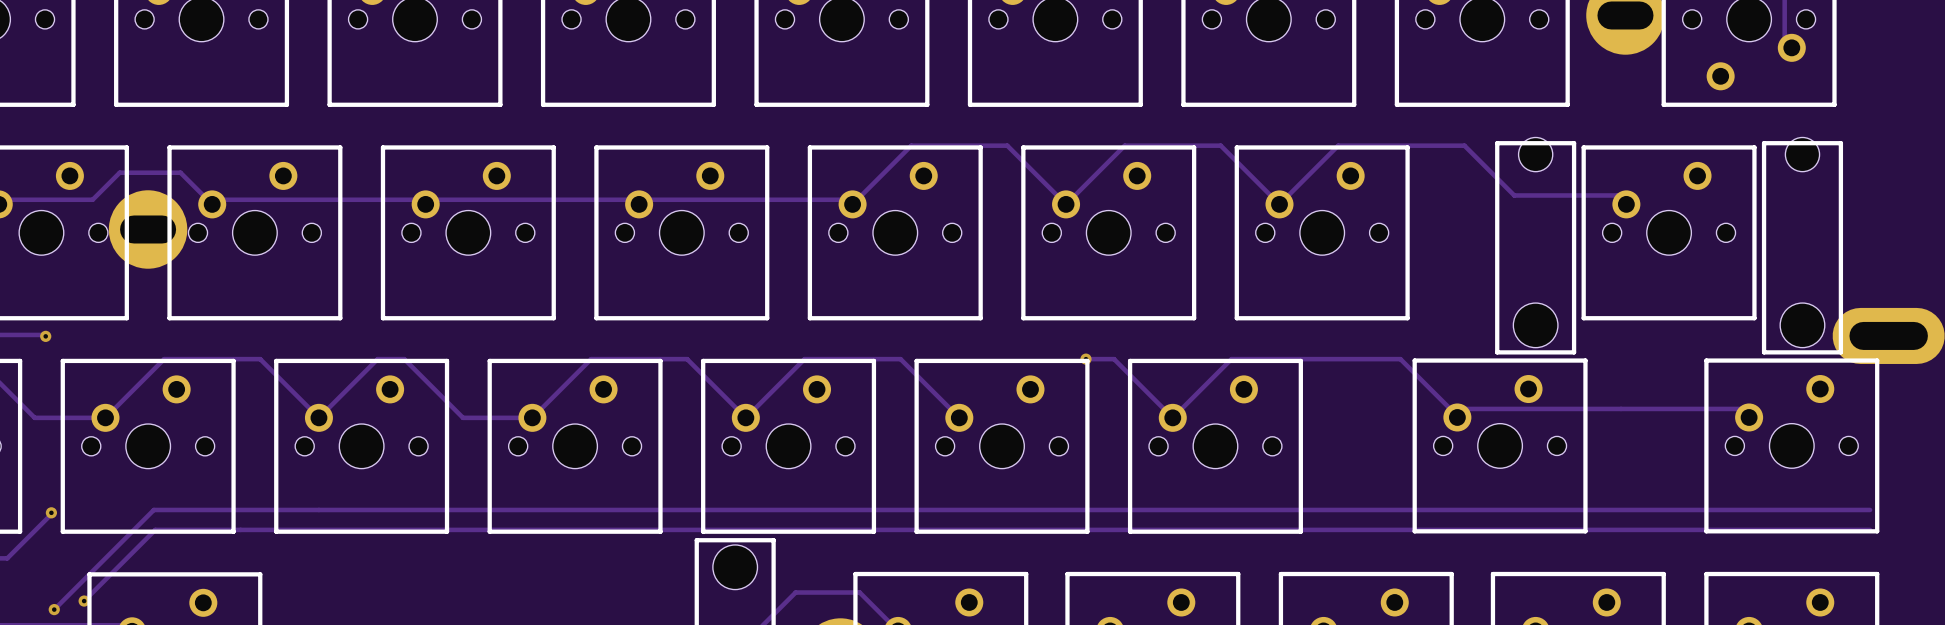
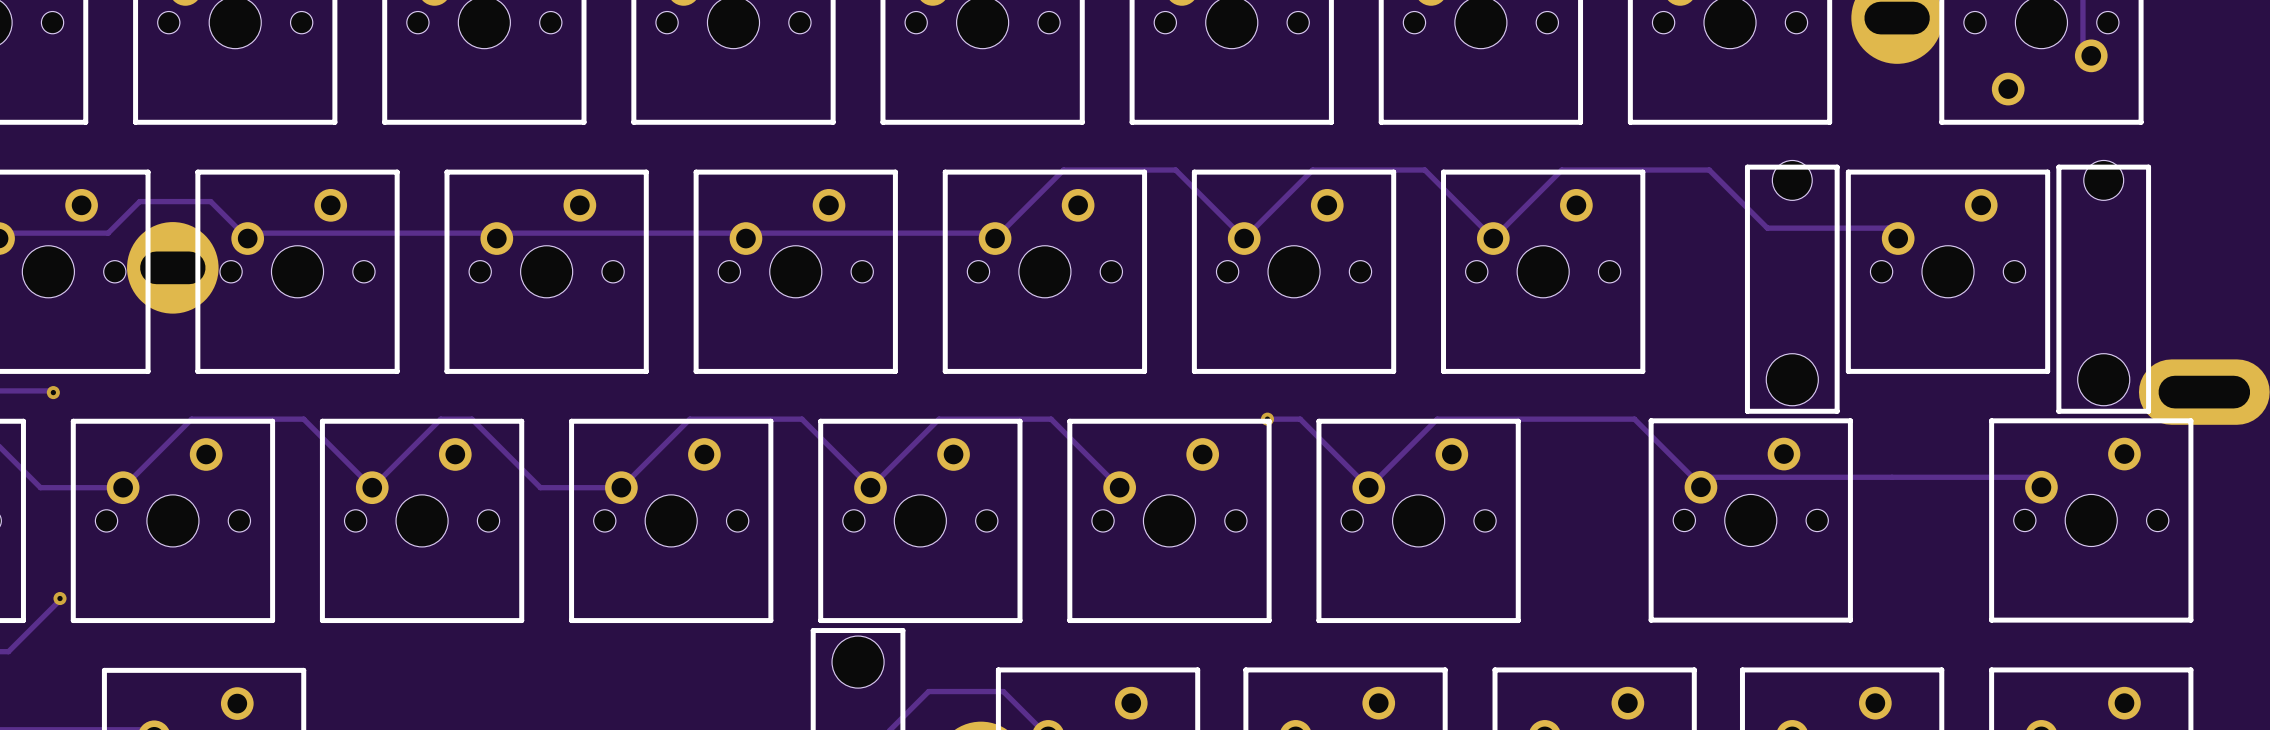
track: (1870, 509) (153, 509) (54, 609) -> none
track: (1870, 529) (155, 529) (84, 601) -> none
via: (84, 601) -> none
via: (54, 609) -> none

